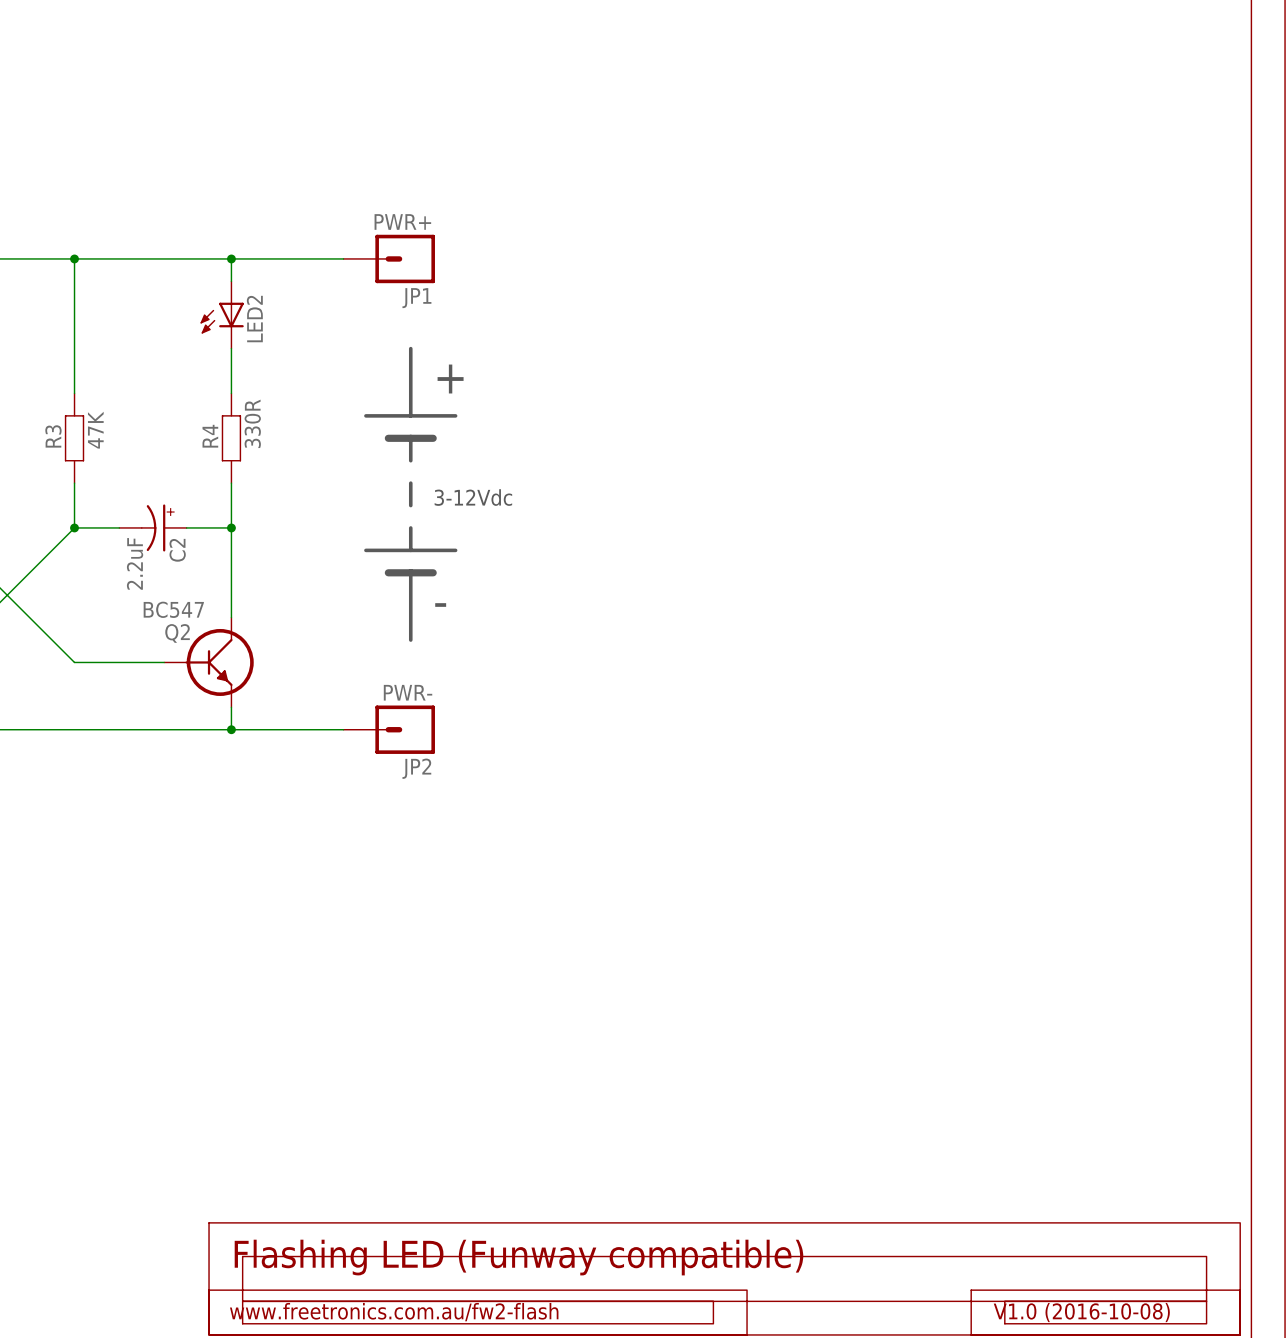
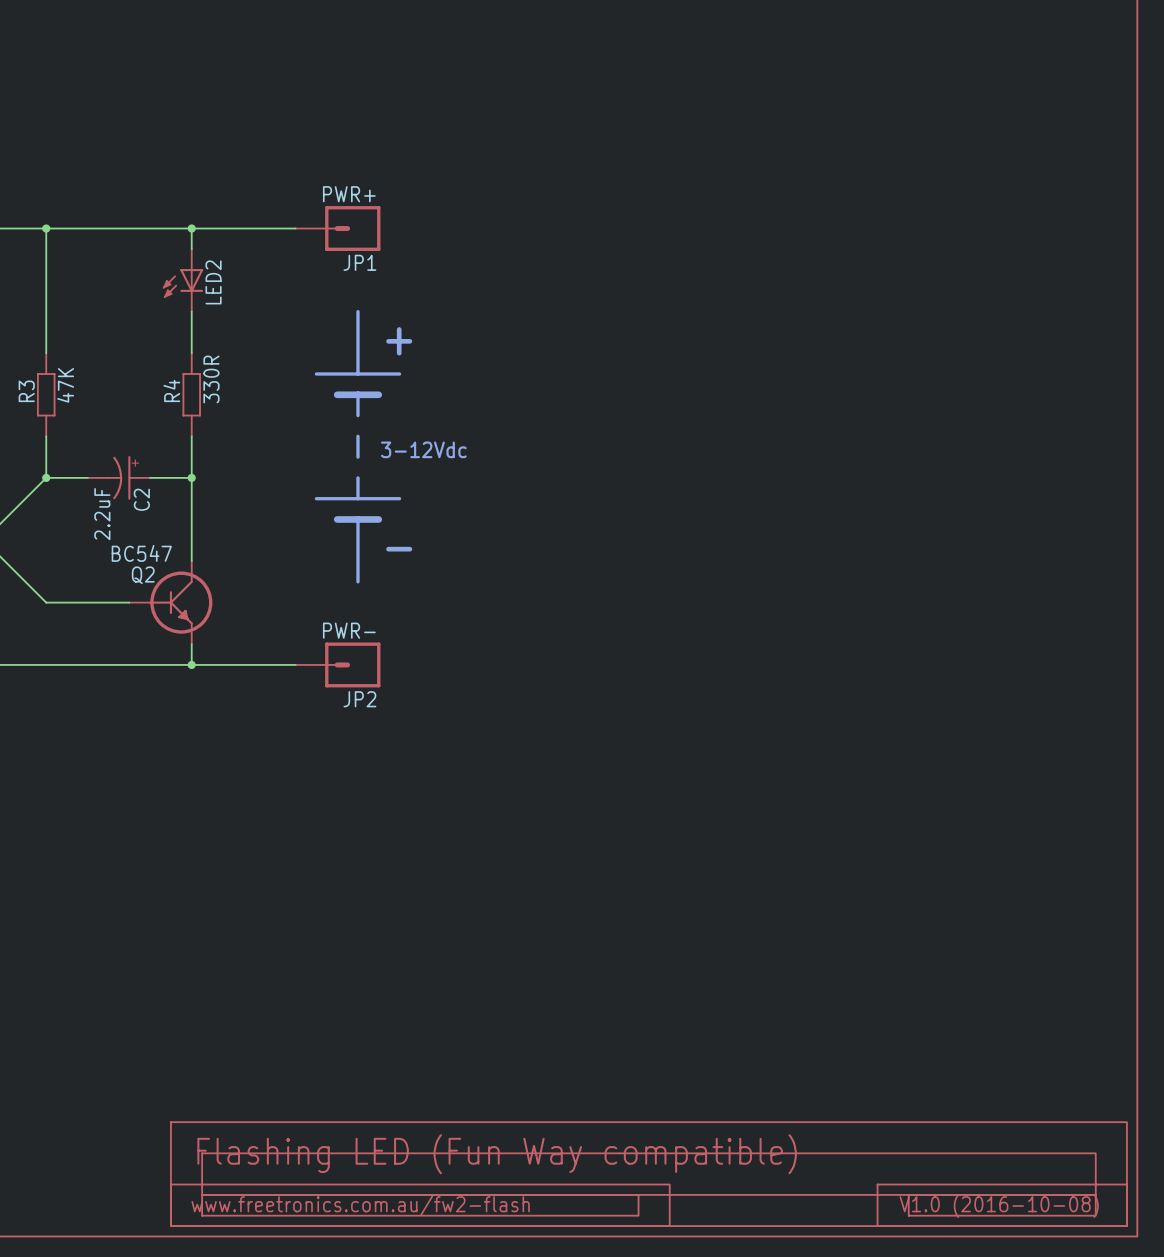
text: Flashing LED (Funway compatible) (518, 1257) -> Flashing LED (Fun Way compatible) (497, 1154)

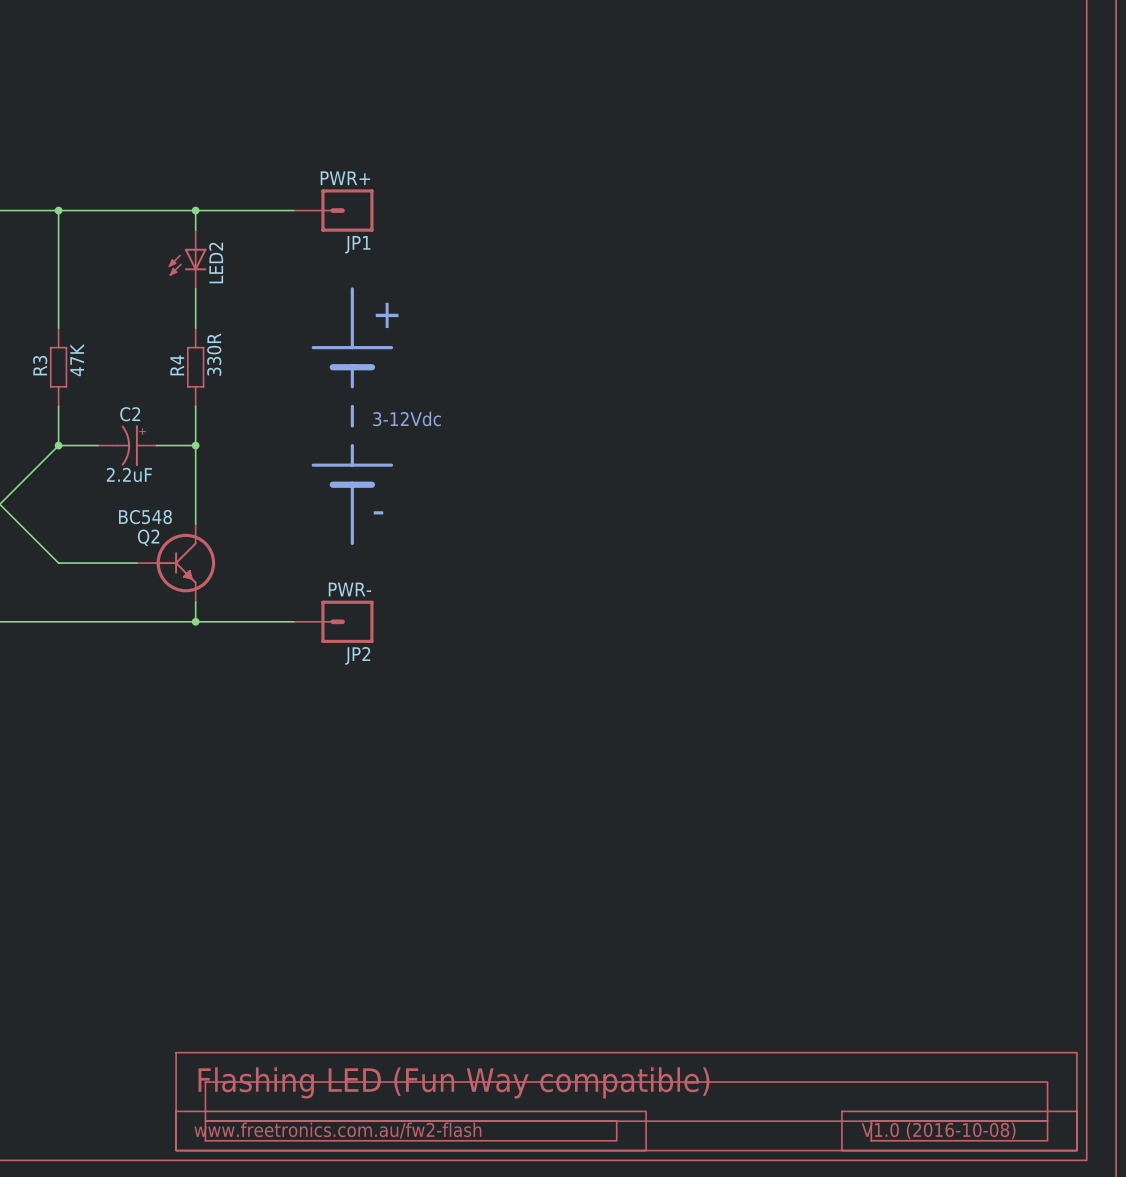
C2 name rotation: 0° (141, 499) -> 90° clockwise (130, 414)
C2 name position: C2 (141, 499) -> C2 (130, 414)
C2 value rotation: 0° (102, 514) -> 90° clockwise (129, 474)
Q2 value: BC547 (141, 553) -> BC548 (145, 517)

